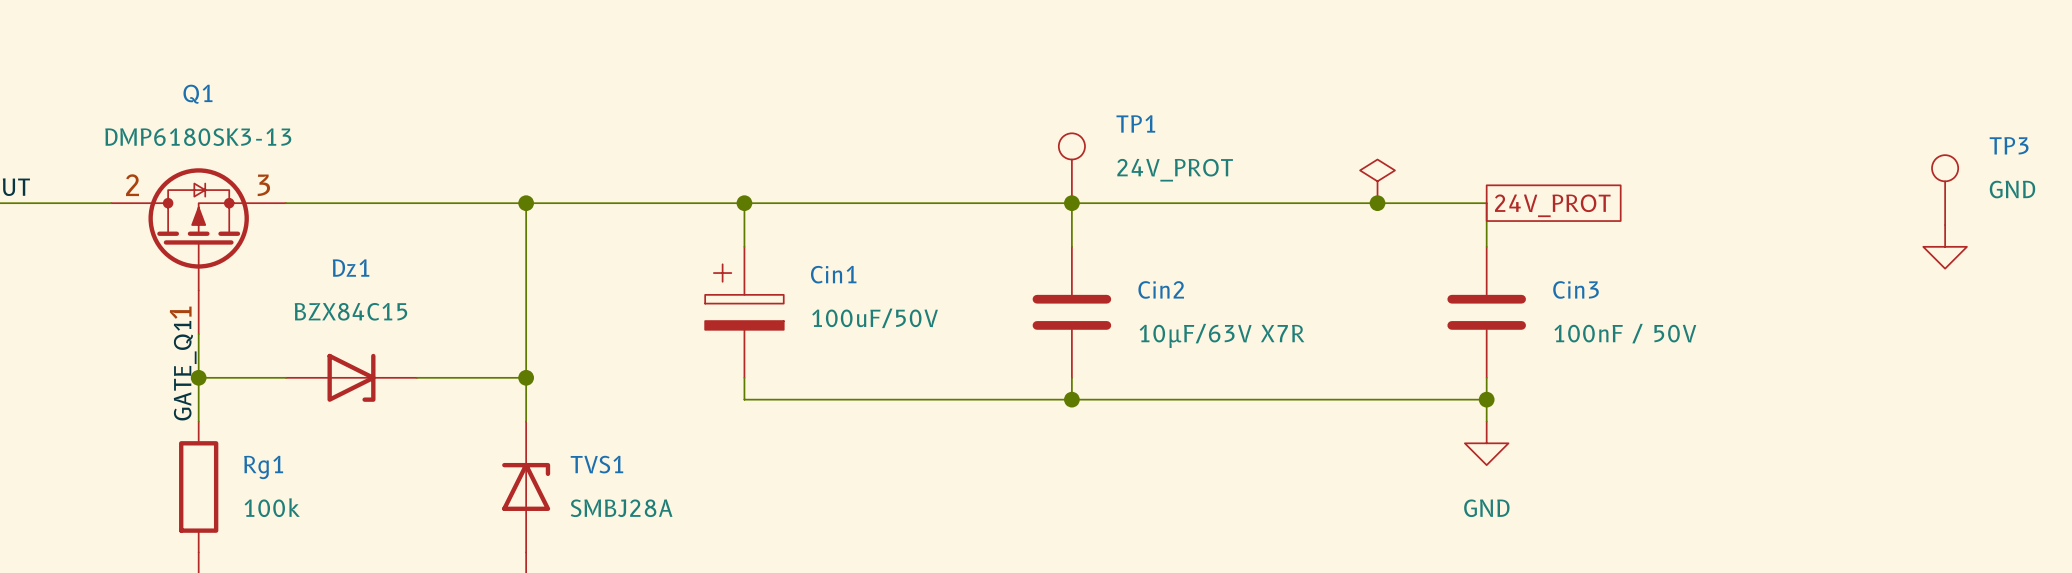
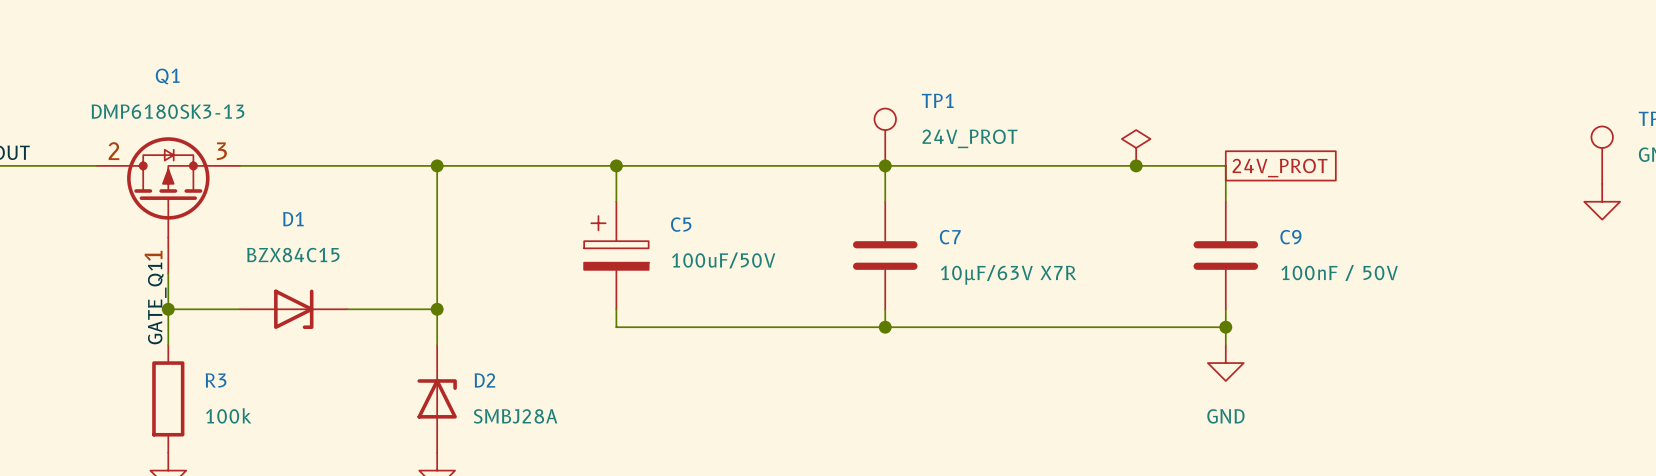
Dz1 name: Dz1 (351, 268) -> D1 (293, 219)
Cin1 name: Cin1 (833, 274) -> C5 (681, 224)
Cin2 name: Cin2 (1161, 289) -> C7 (950, 237)
Cin3 name: Cin3 (1575, 289) -> C9 (1290, 237)
TVS1 name: TVS1 (596, 464) -> D2 (484, 380)
Rg1 name: Rg1 (263, 467) -> R3 (216, 380)

